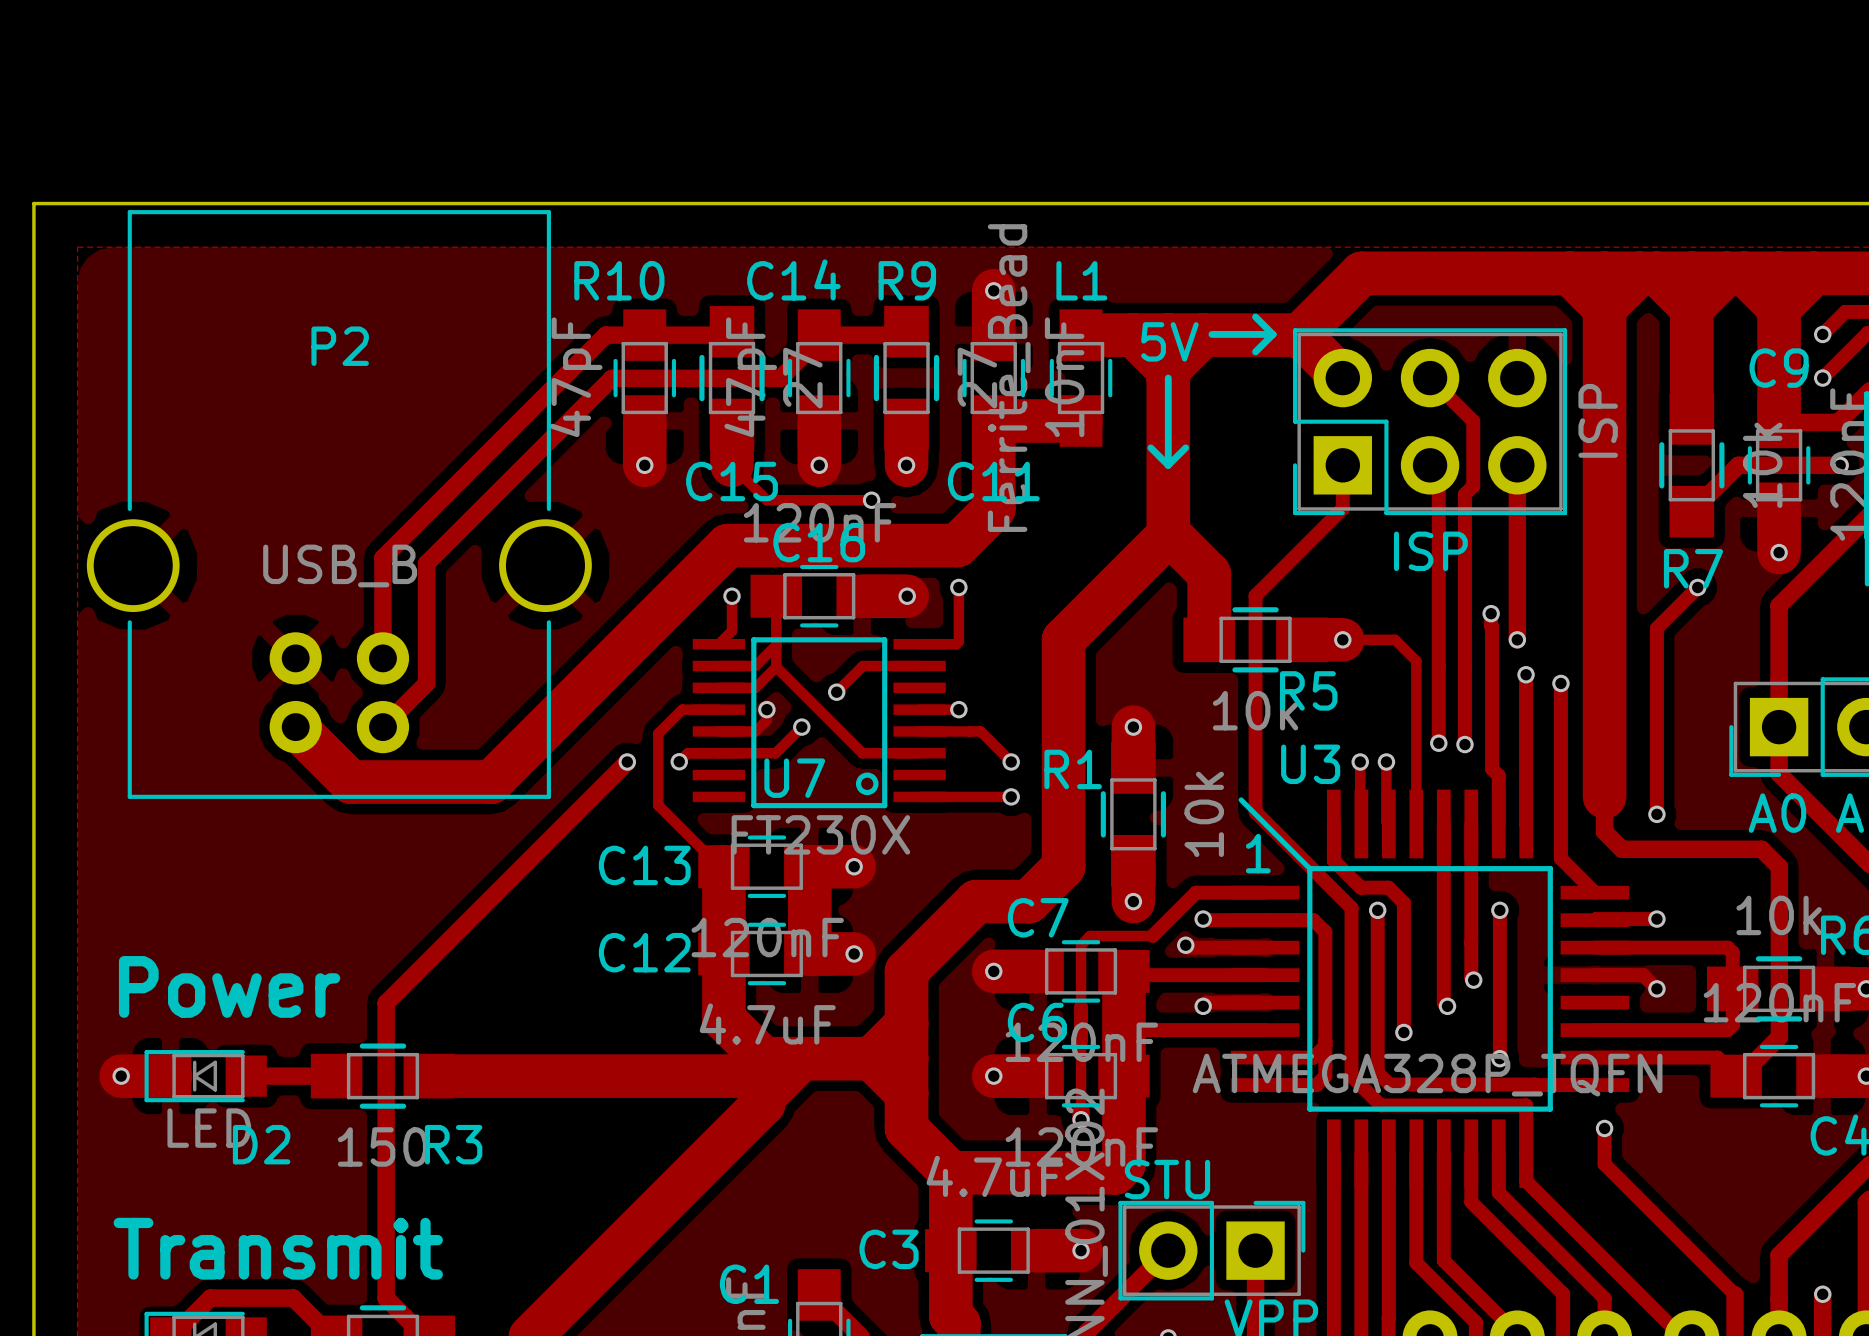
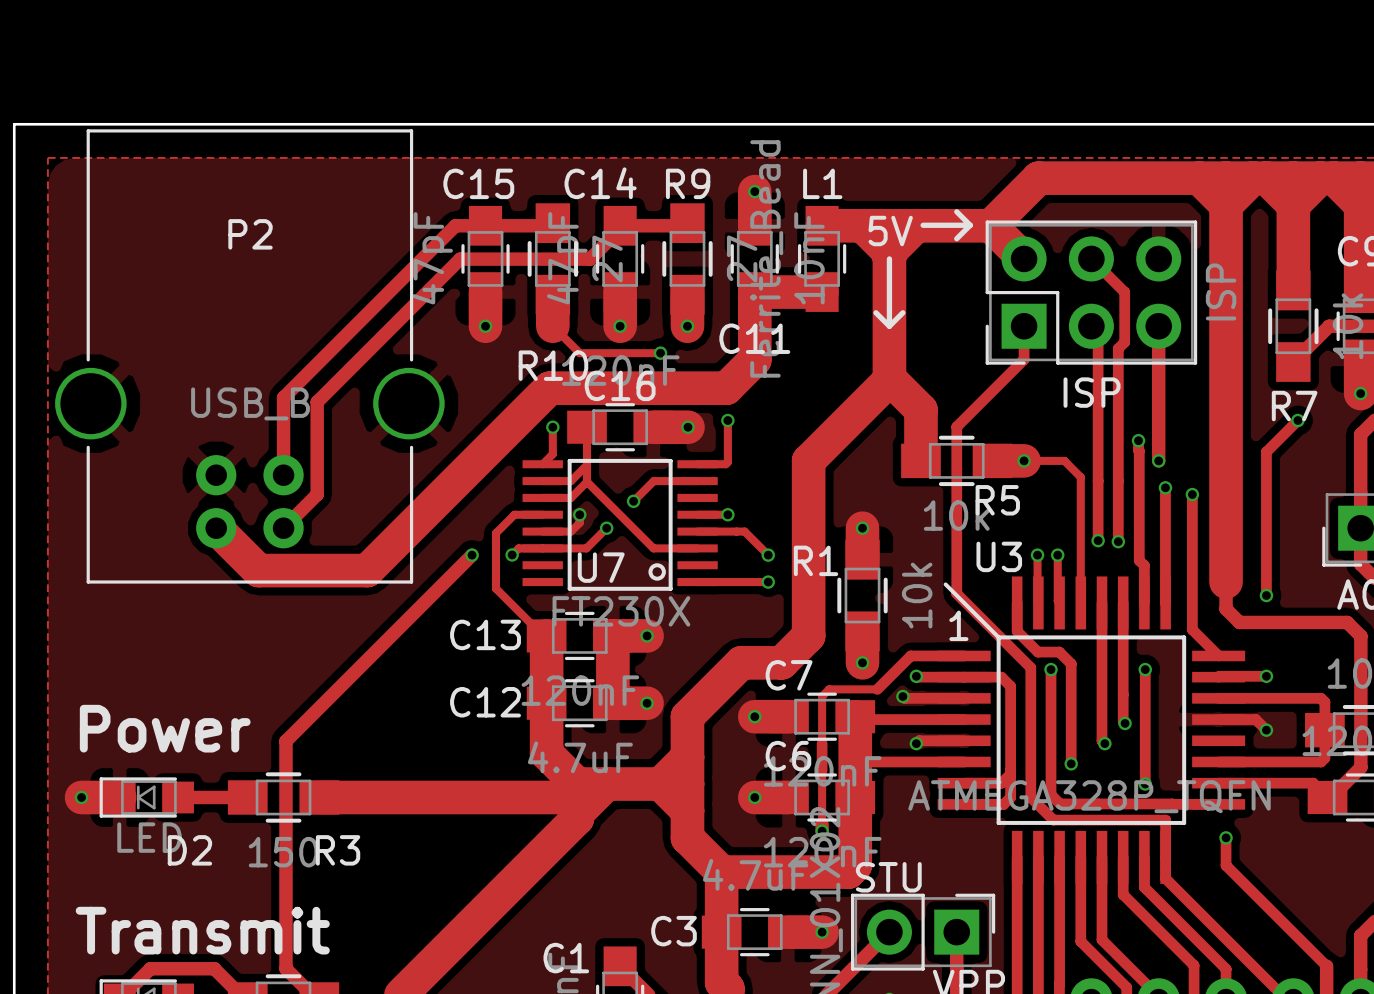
R10 name position: R10 (619, 280) -> R10 (553, 365)
C15 name position: C15 (732, 481) -> C15 (478, 183)

